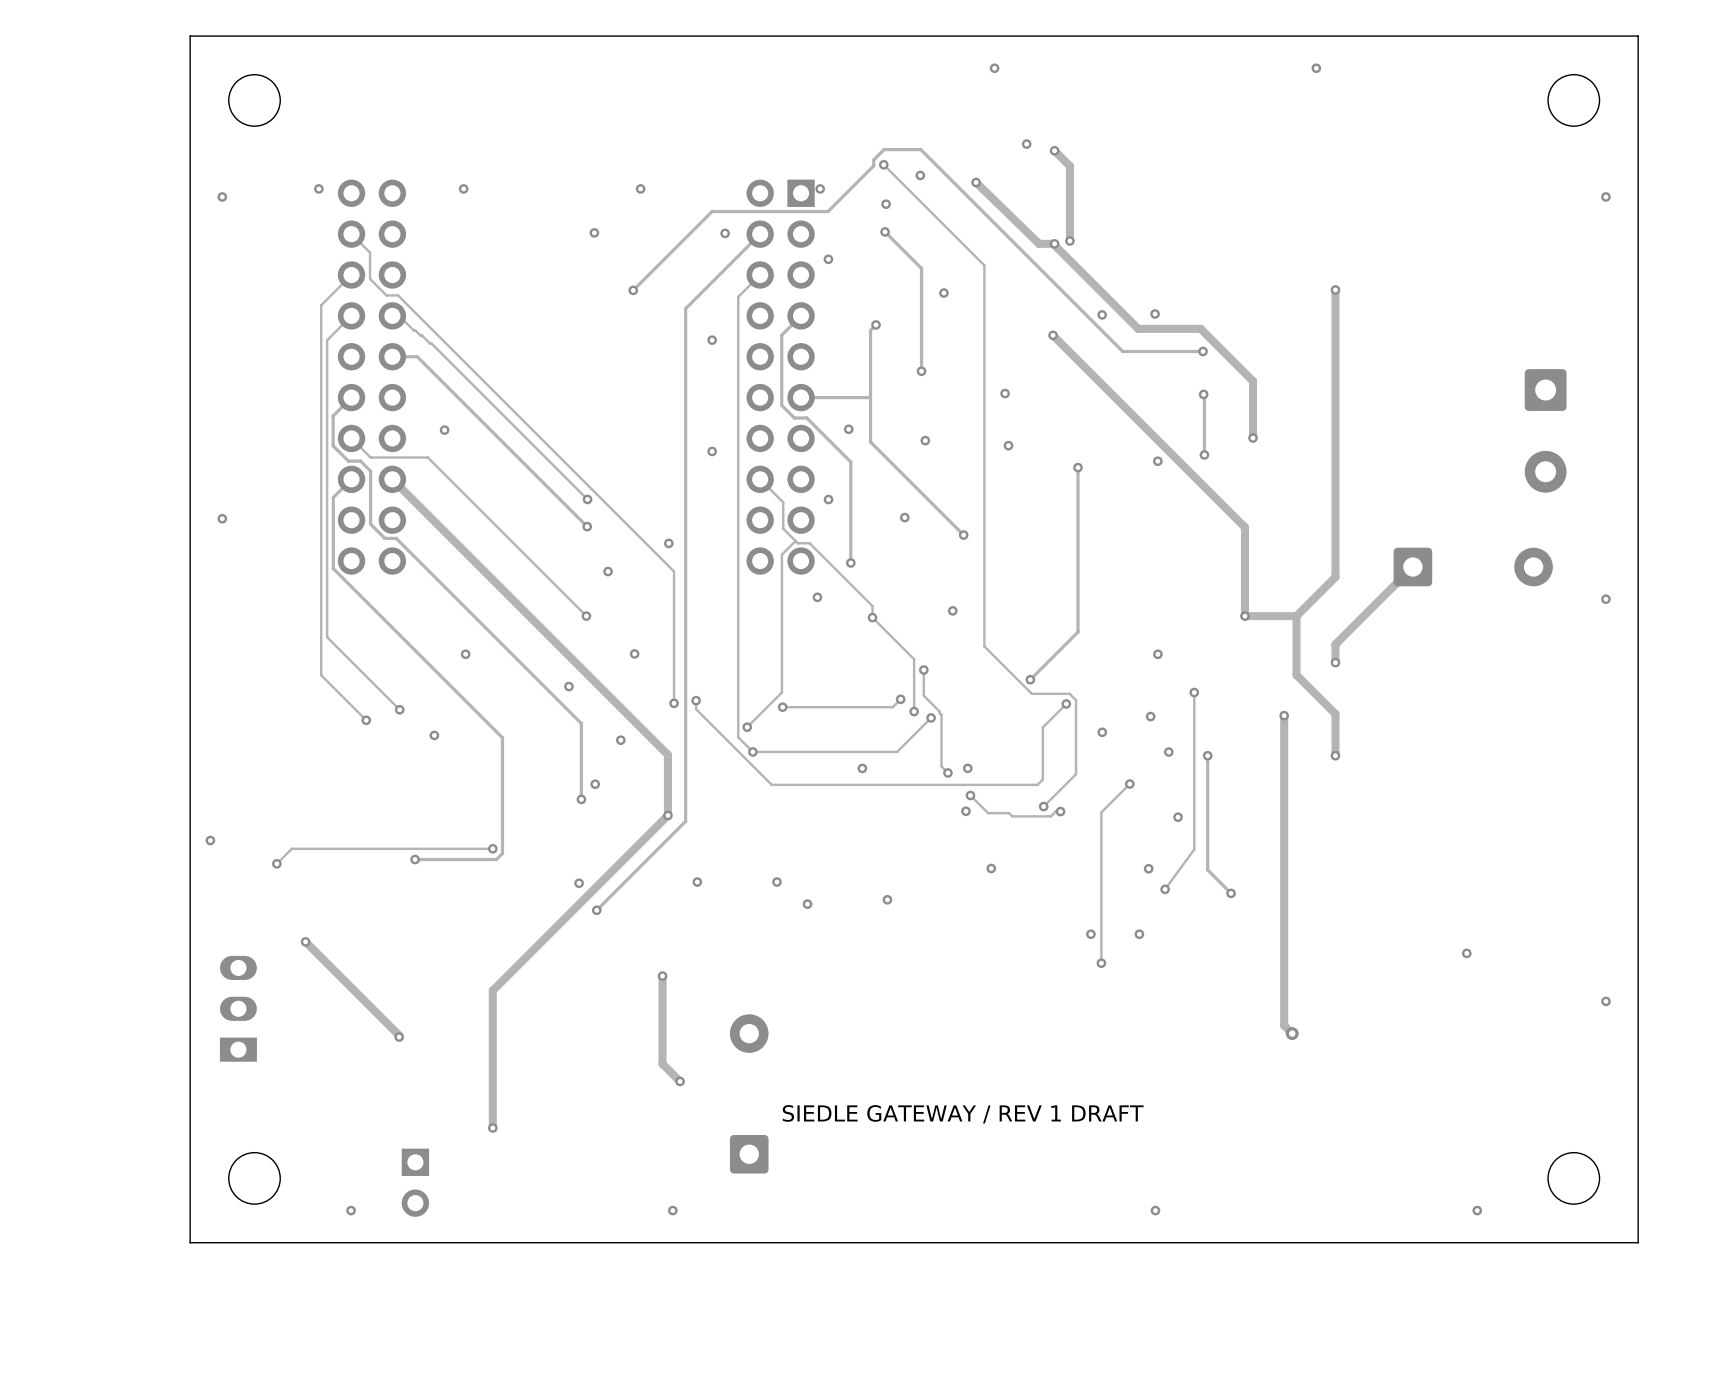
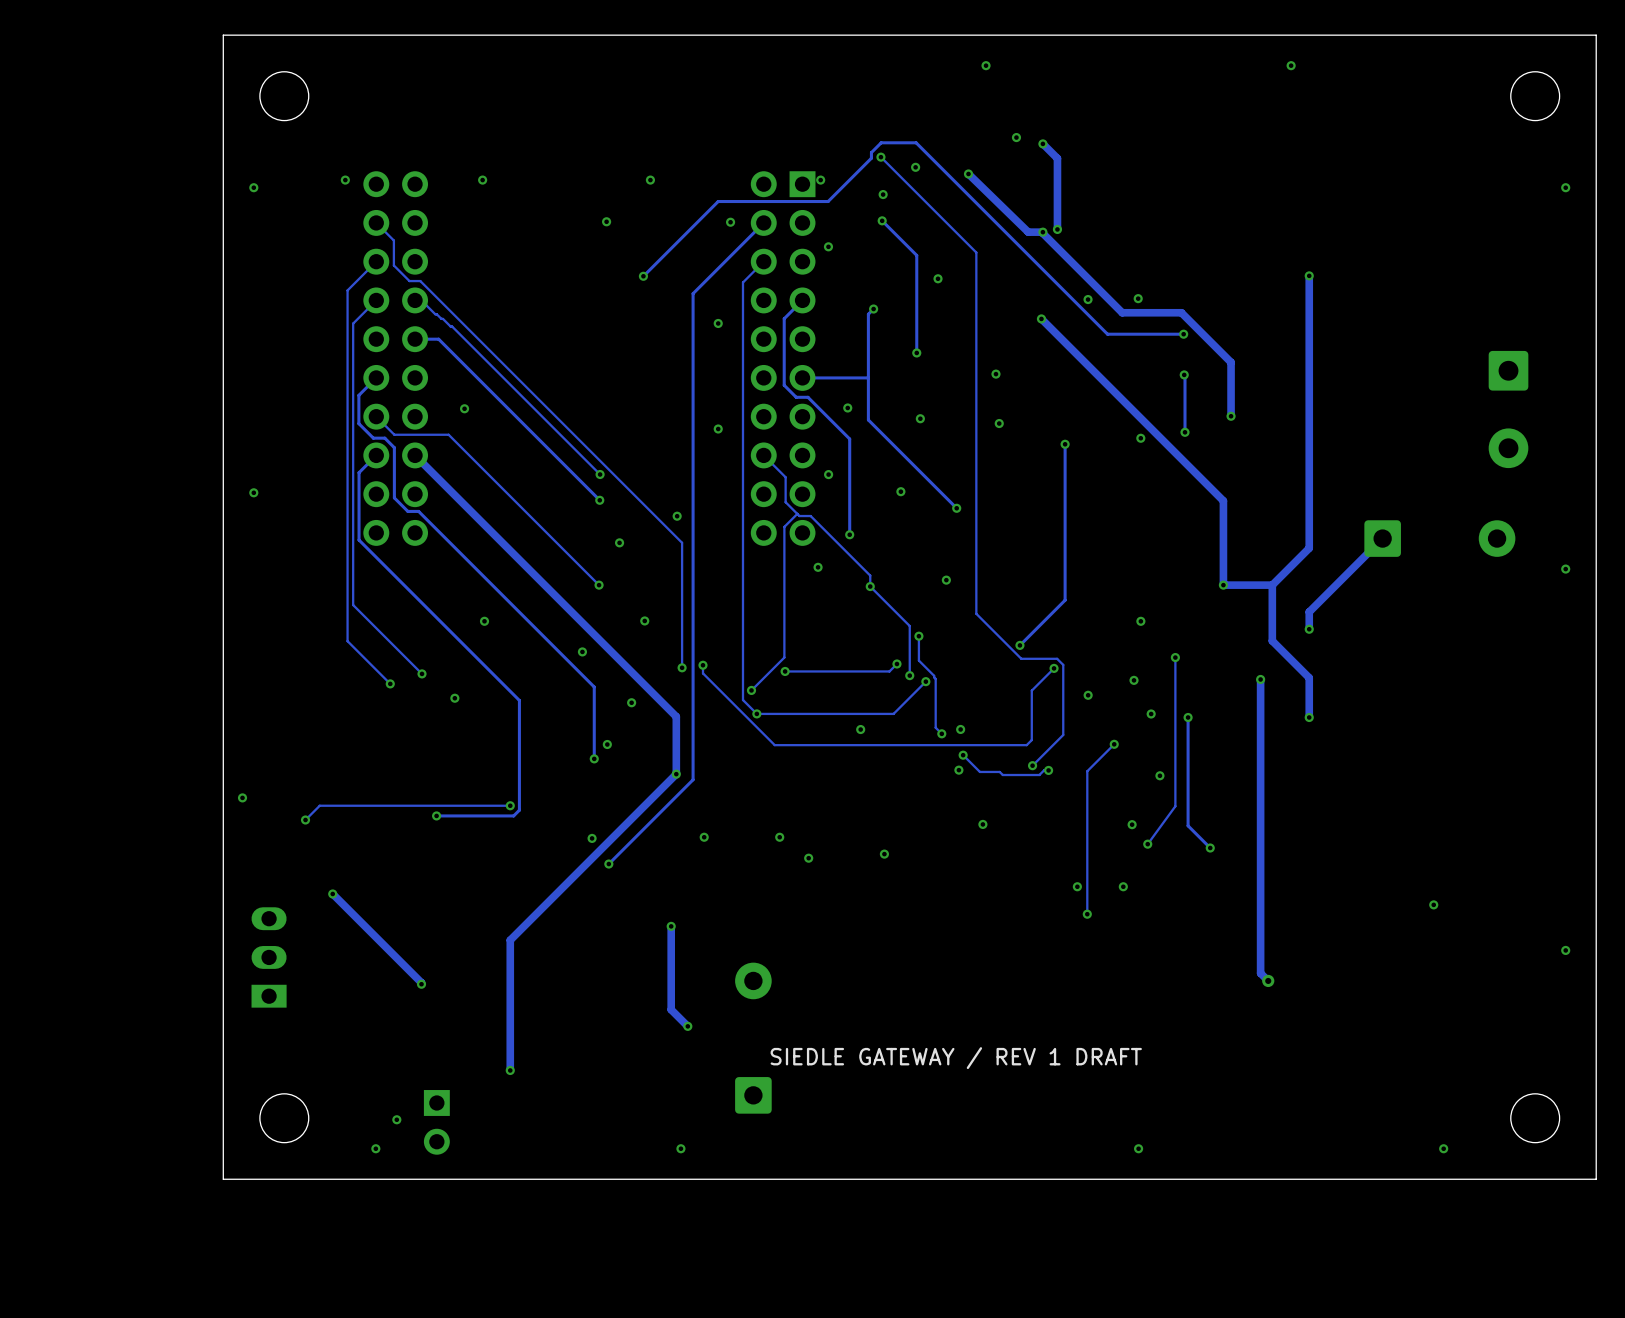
via: none -> (396, 1119)

